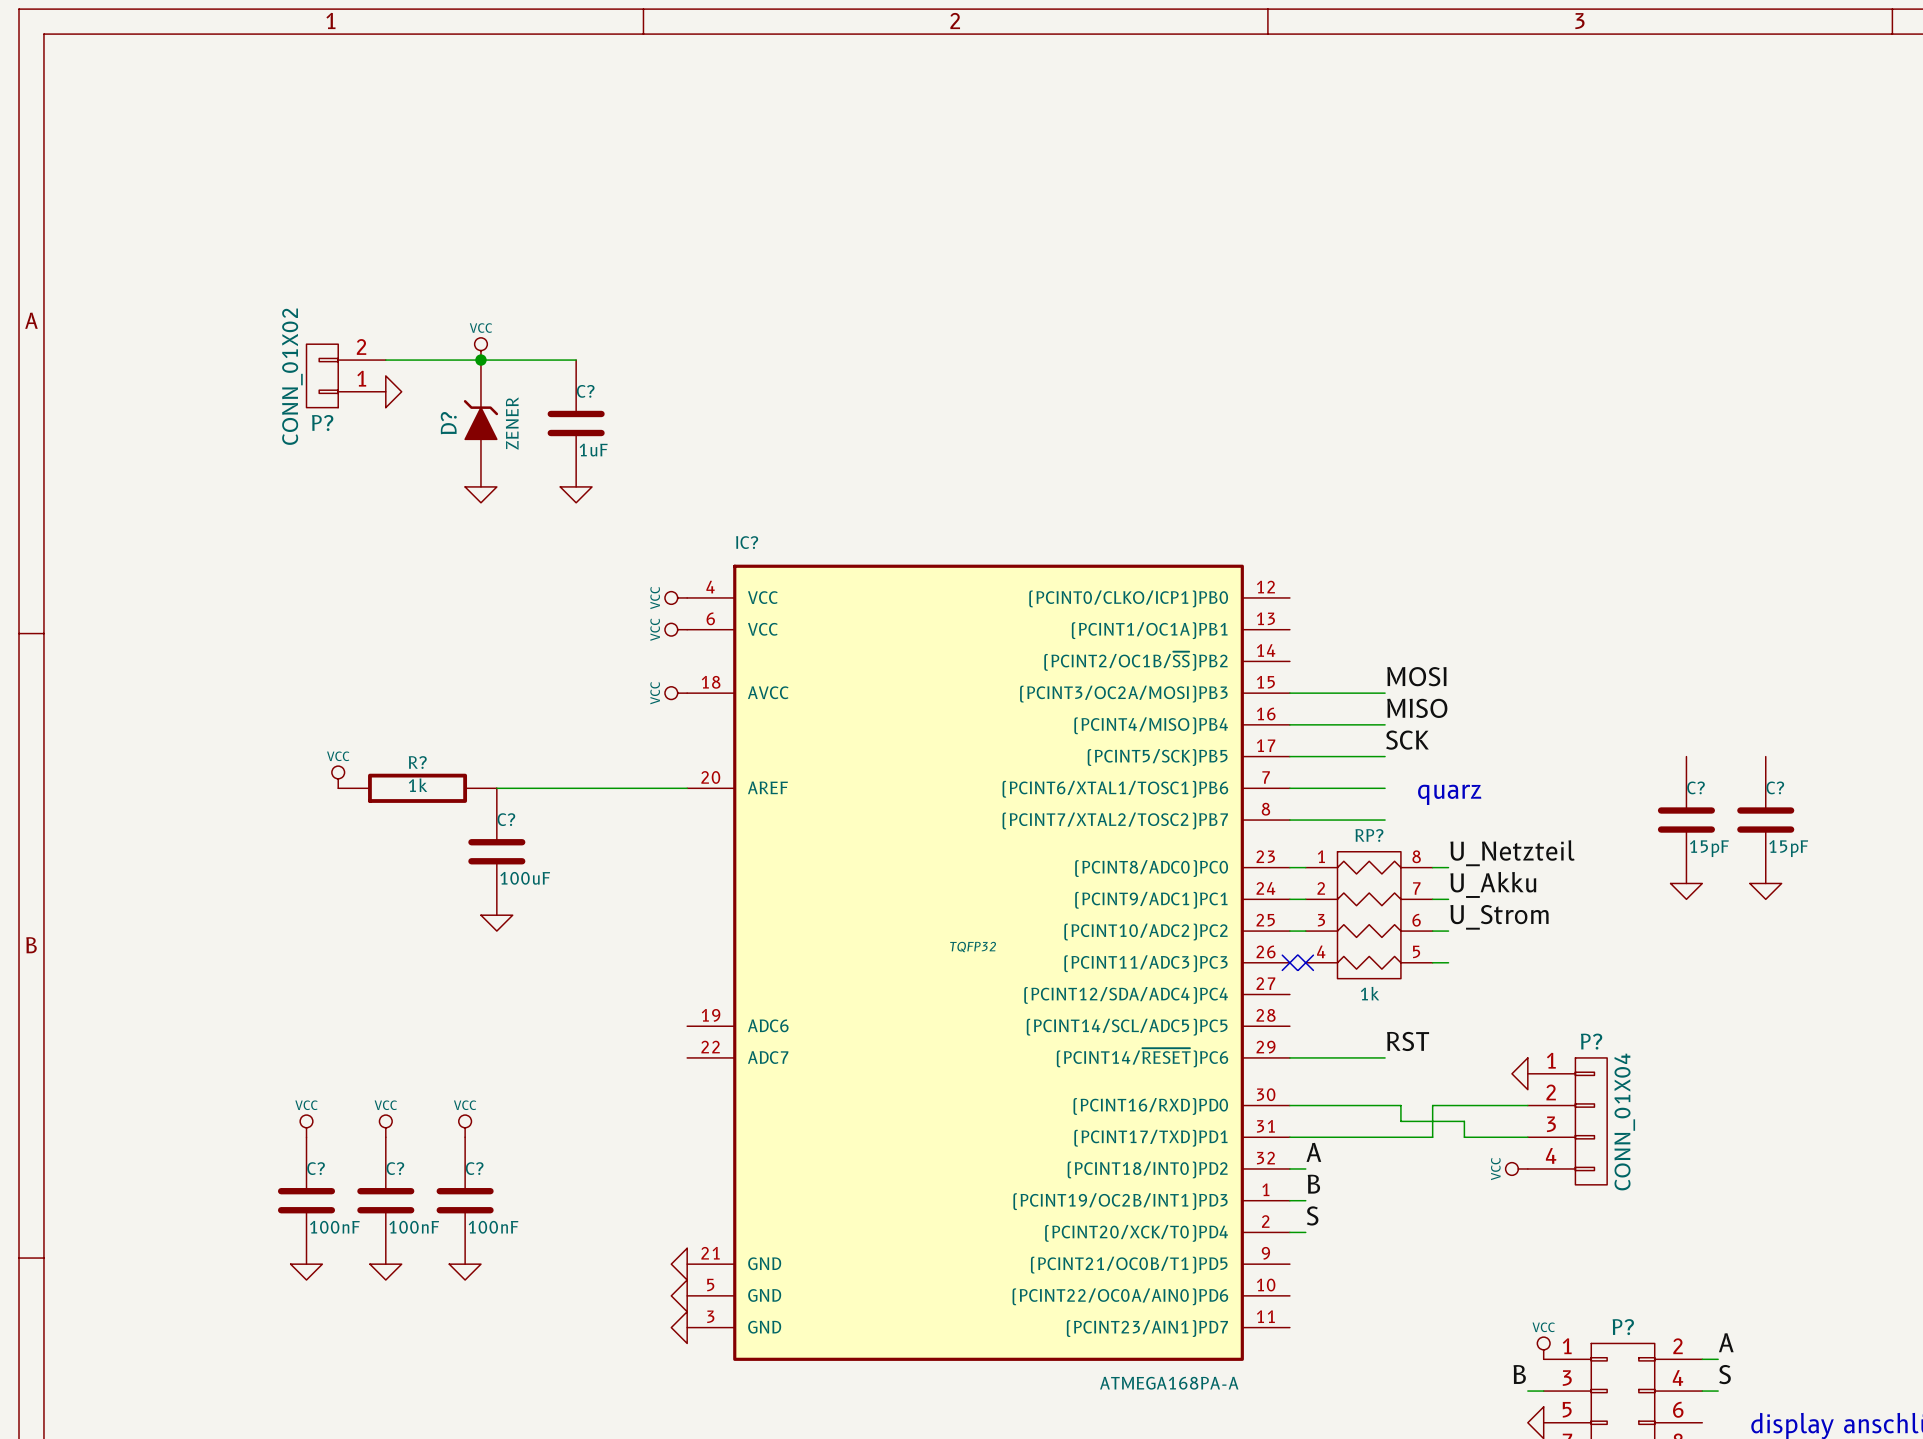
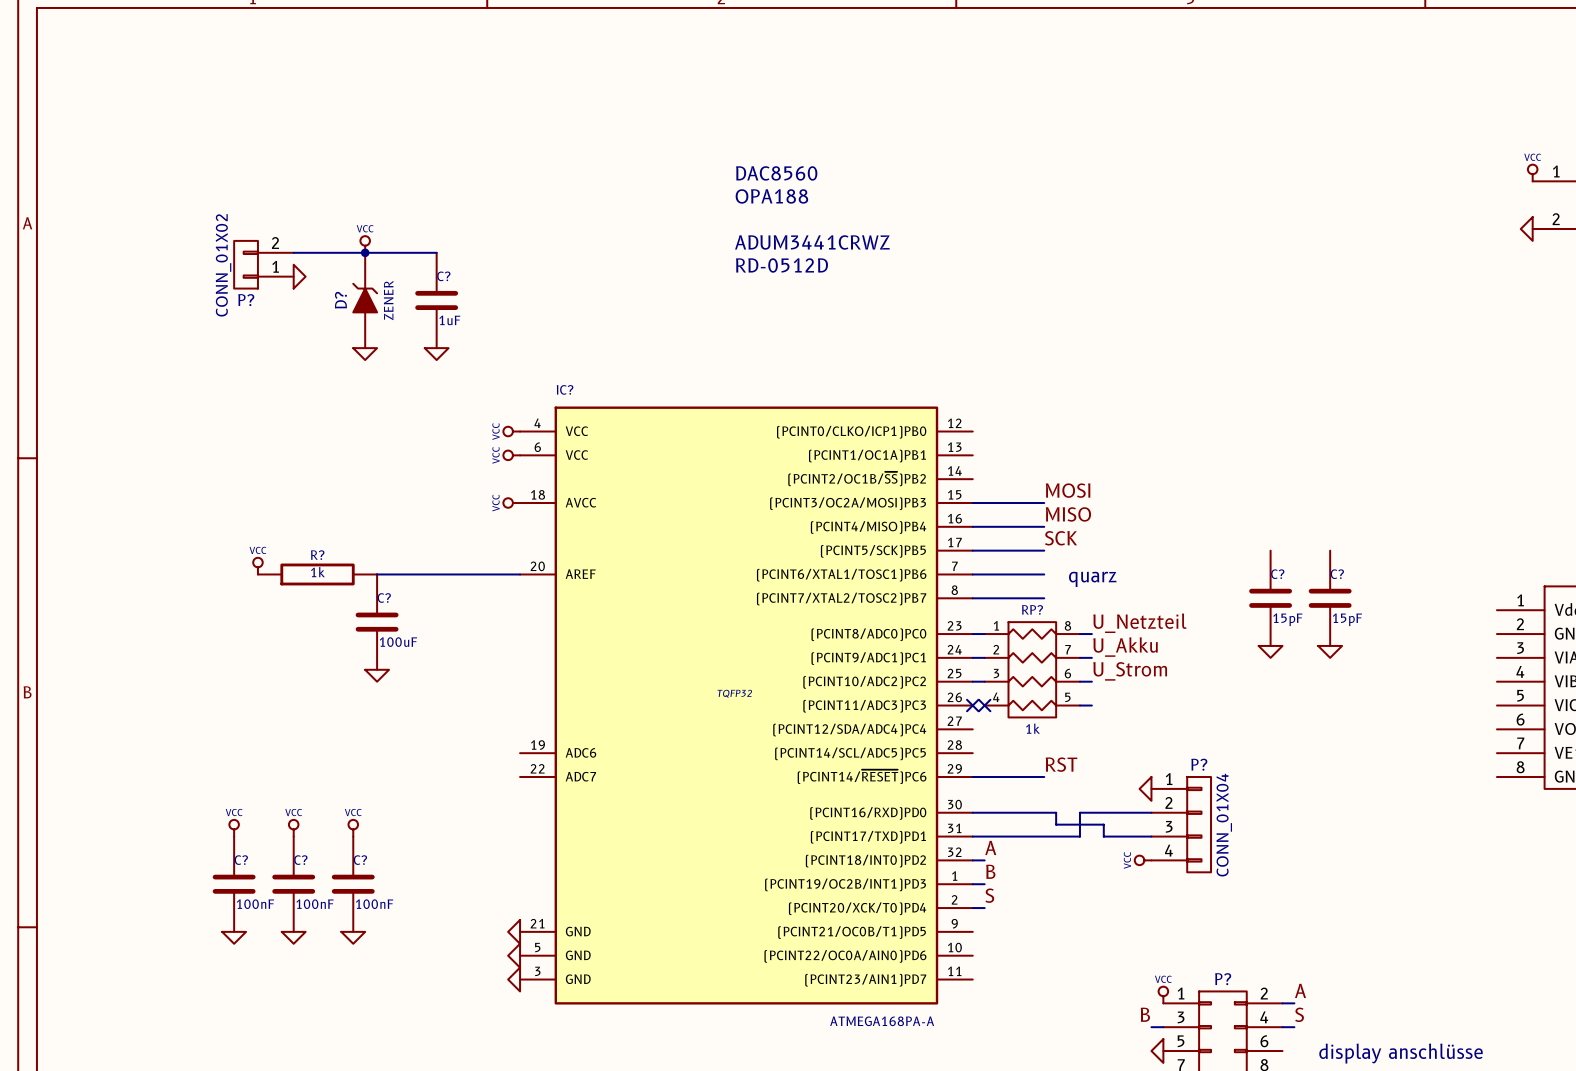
text: none -> DAC8560 (776, 173)
text: none -> OPA188 (771, 196)
text: none -> ADUM3441CRWZ (812, 242)
text: none -> RD-0512D (781, 265)

